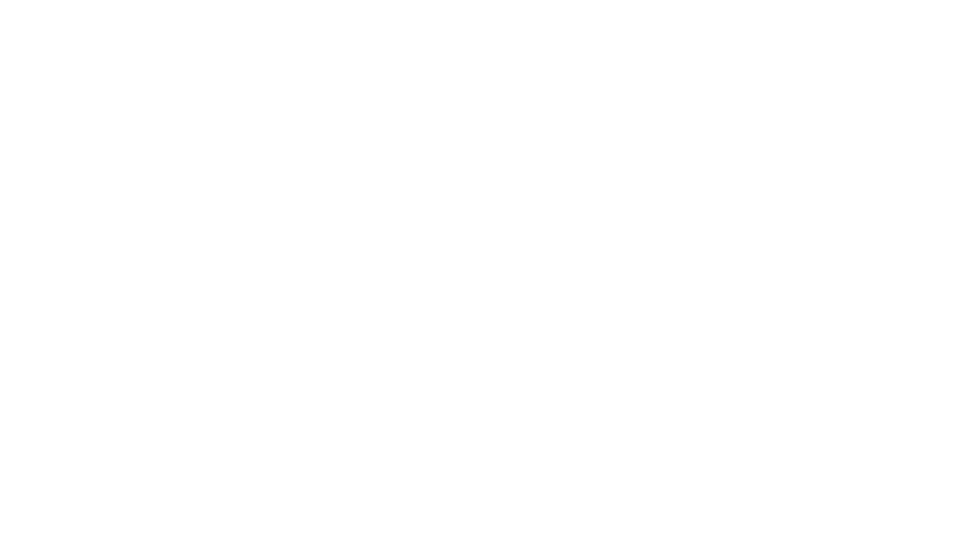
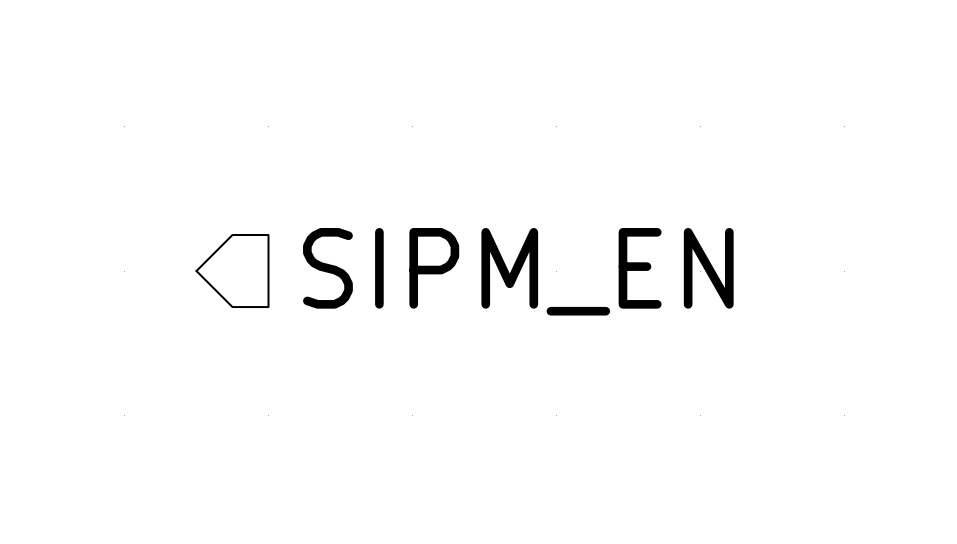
hierarchical label: none -> SIPM_EN (518, 271)

